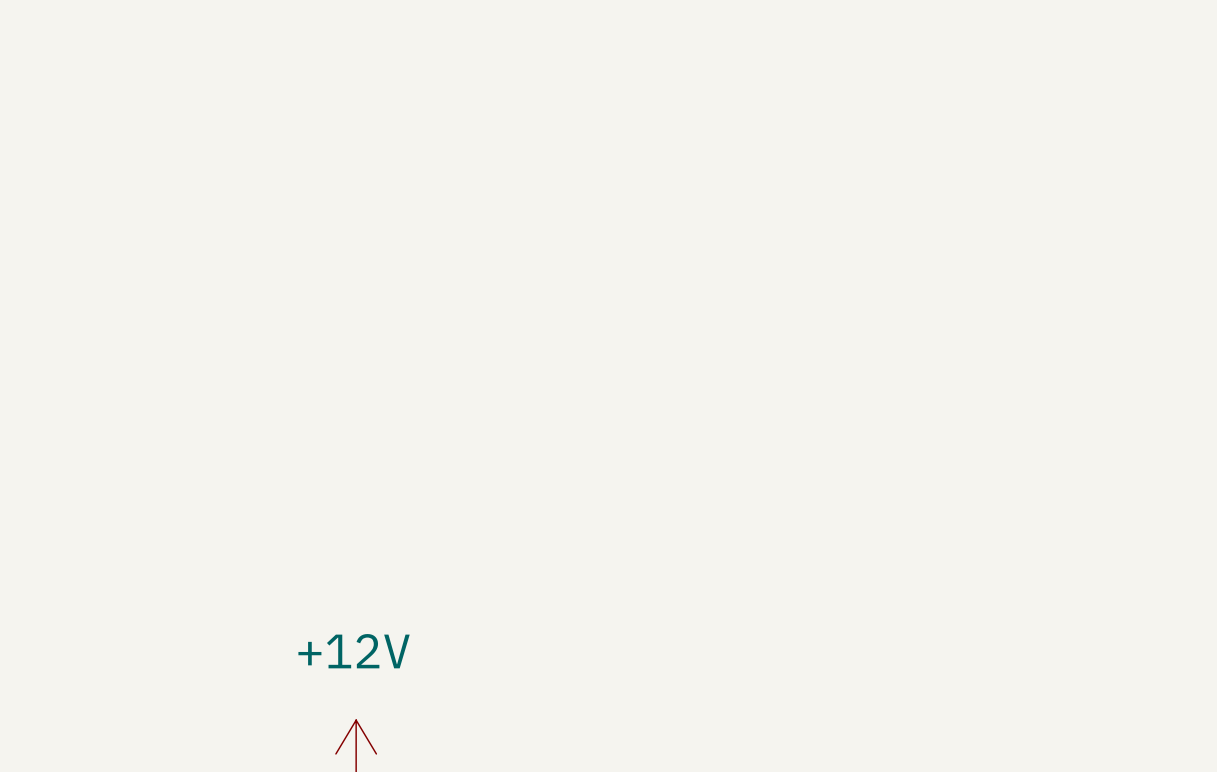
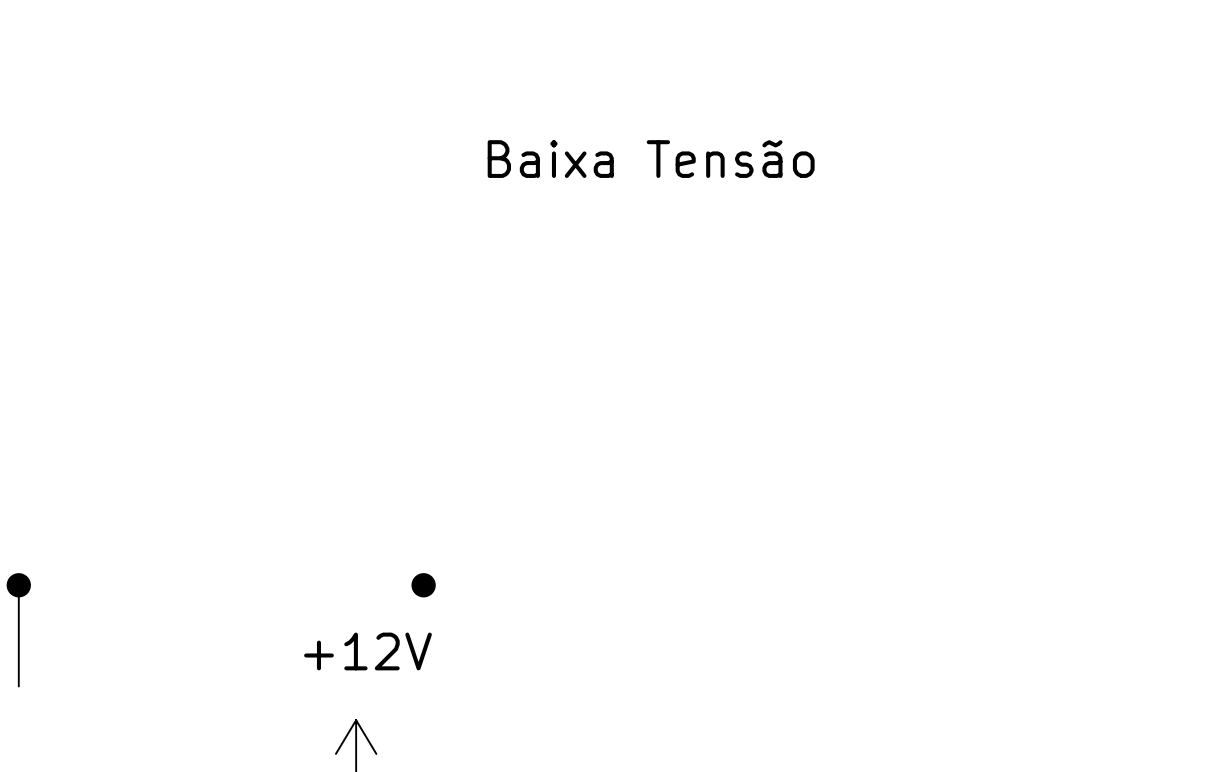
text: none -> Baixa Tensão (651, 159)
wire: none -> (18, 585) (18, 686)
junction: none -> (18, 585)
junction: none -> (423, 585)

